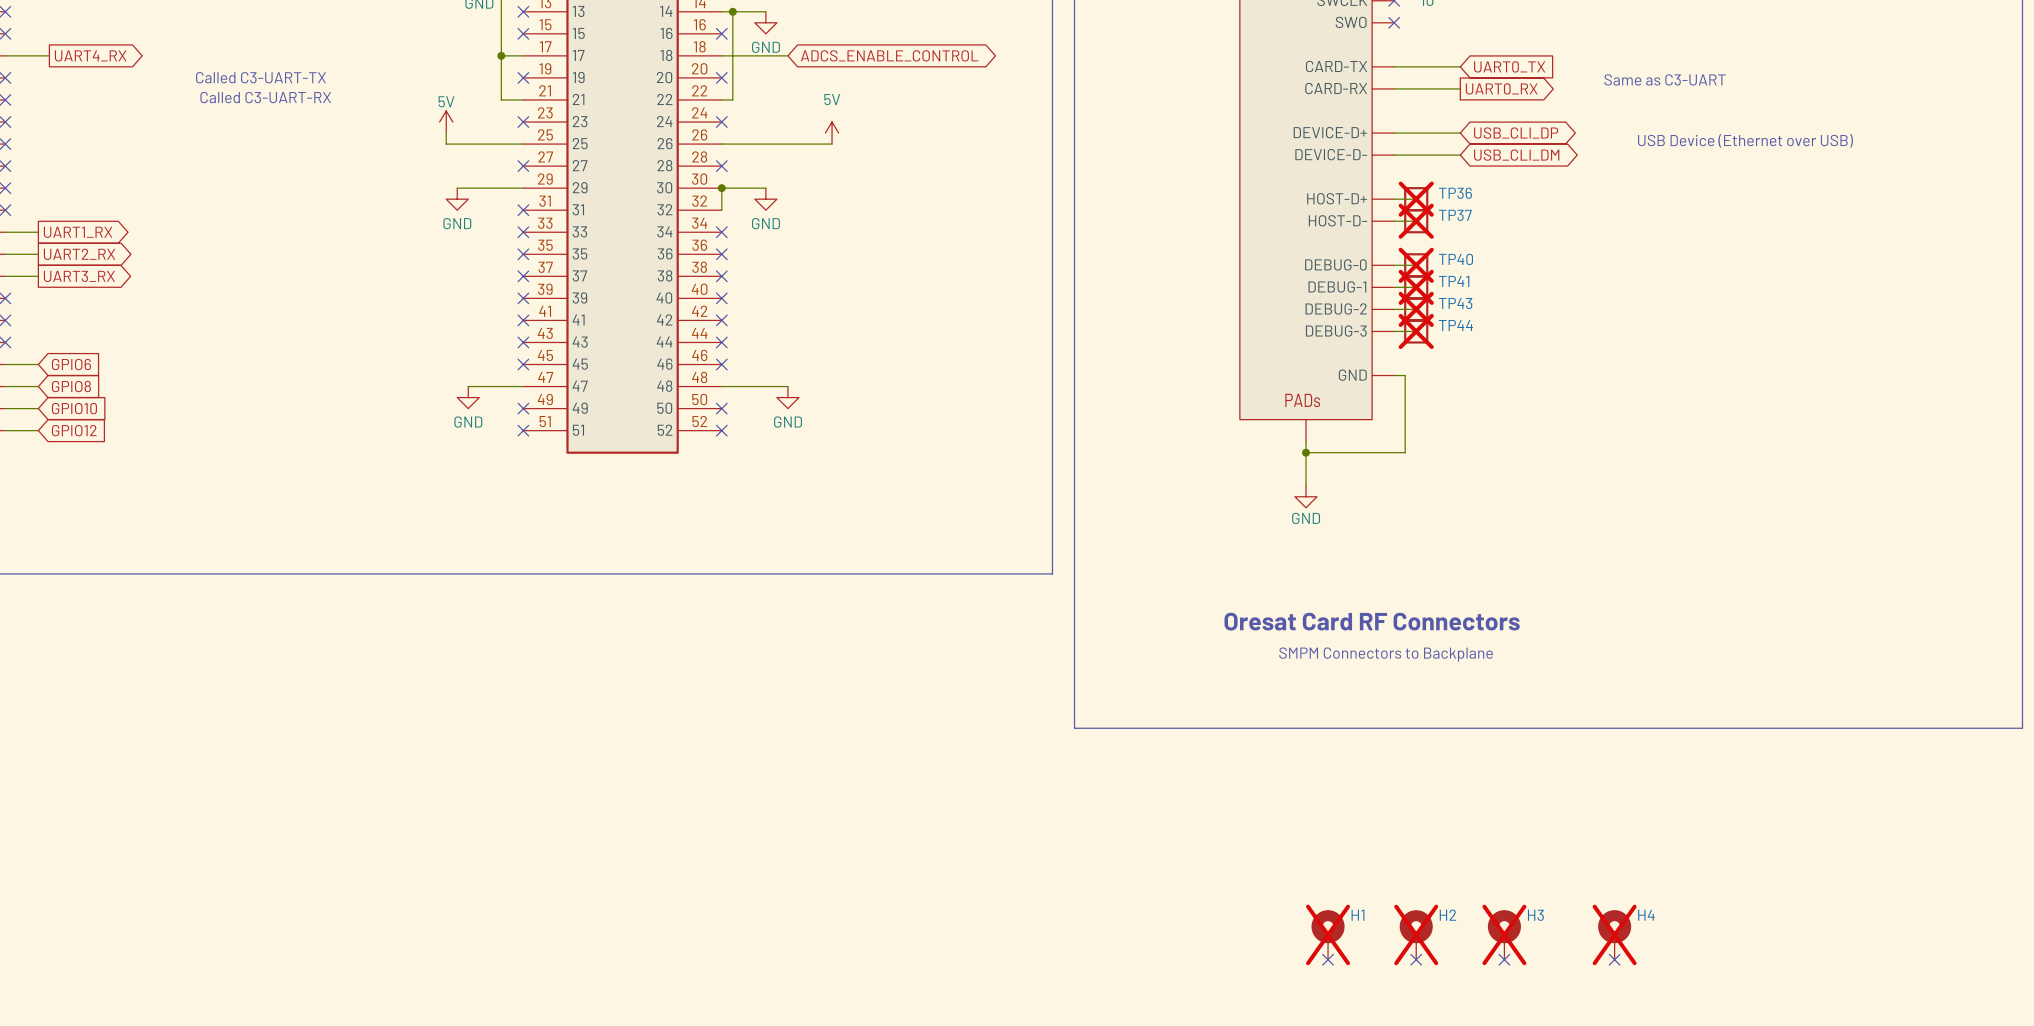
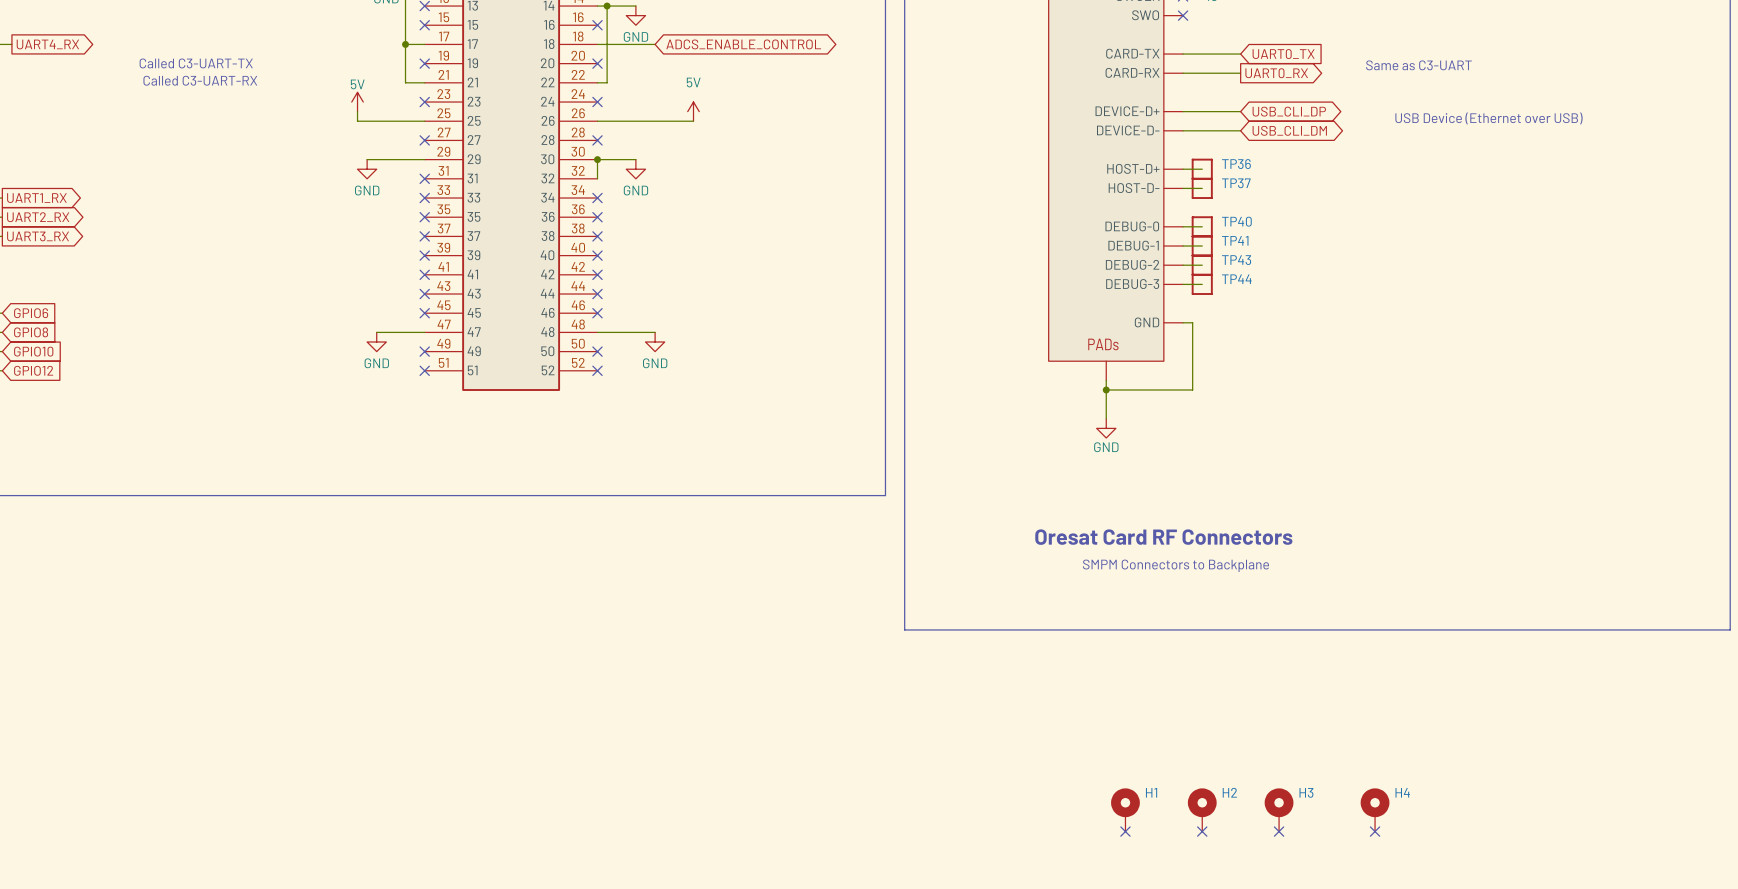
TP36 do-not-place cross: (1416, 199) -> none
TP37 do-not-place cross: (1416, 221) -> none
TP40 do-not-place cross: (1416, 265) -> none
TP41 do-not-place cross: (1416, 287) -> none
TP43 do-not-place cross: (1416, 309) -> none
TP44 do-not-place cross: (1416, 331) -> none
H1 do-not-place cross: (1328, 934) -> none
H2 do-not-place cross: (1416, 934) -> none
H3 do-not-place cross: (1504, 934) -> none
H4 do-not-place cross: (1614, 934) -> none

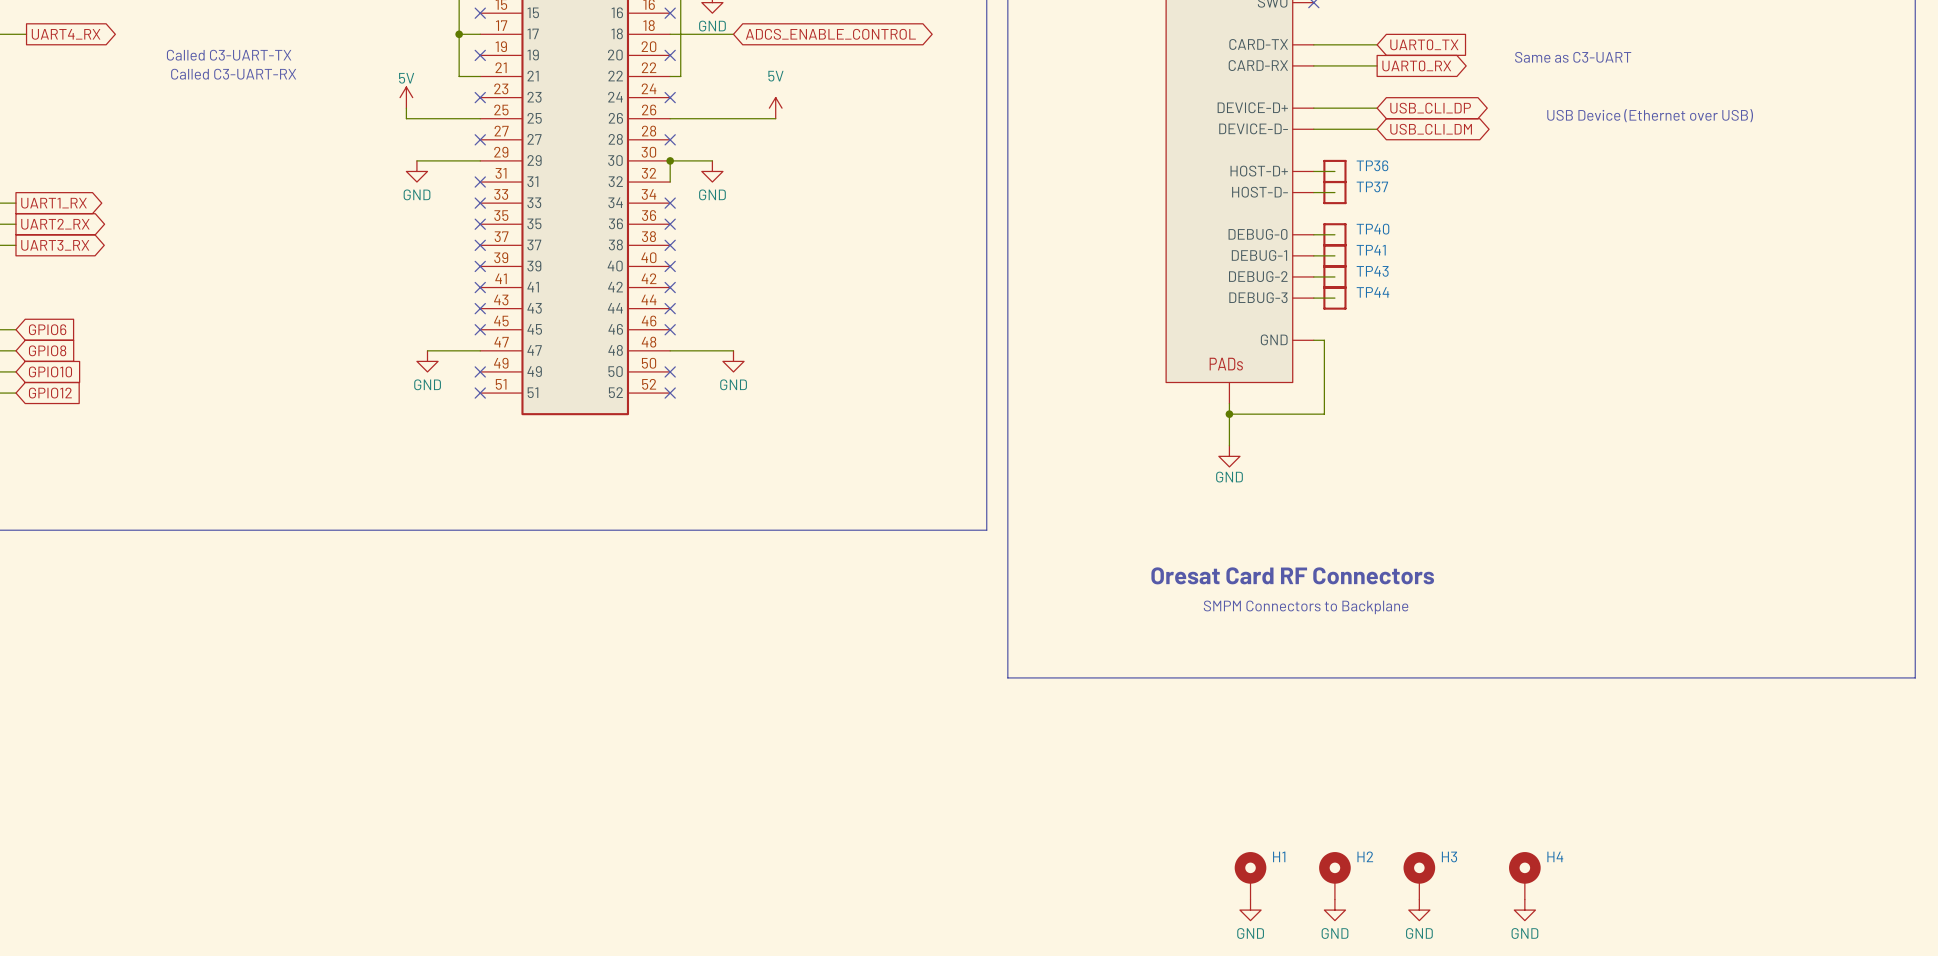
no-connect mark: (1125, 831) -> none
no-connect mark: (1202, 831) -> none
no-connect mark: (1279, 831) -> none
no-connect mark: (1375, 831) -> none
power symbol: none -> GND (1250, 910)
power symbol: none -> GND (1334, 910)
power symbol: none -> GND (1419, 910)
power symbol: none -> GND (1524, 910)

